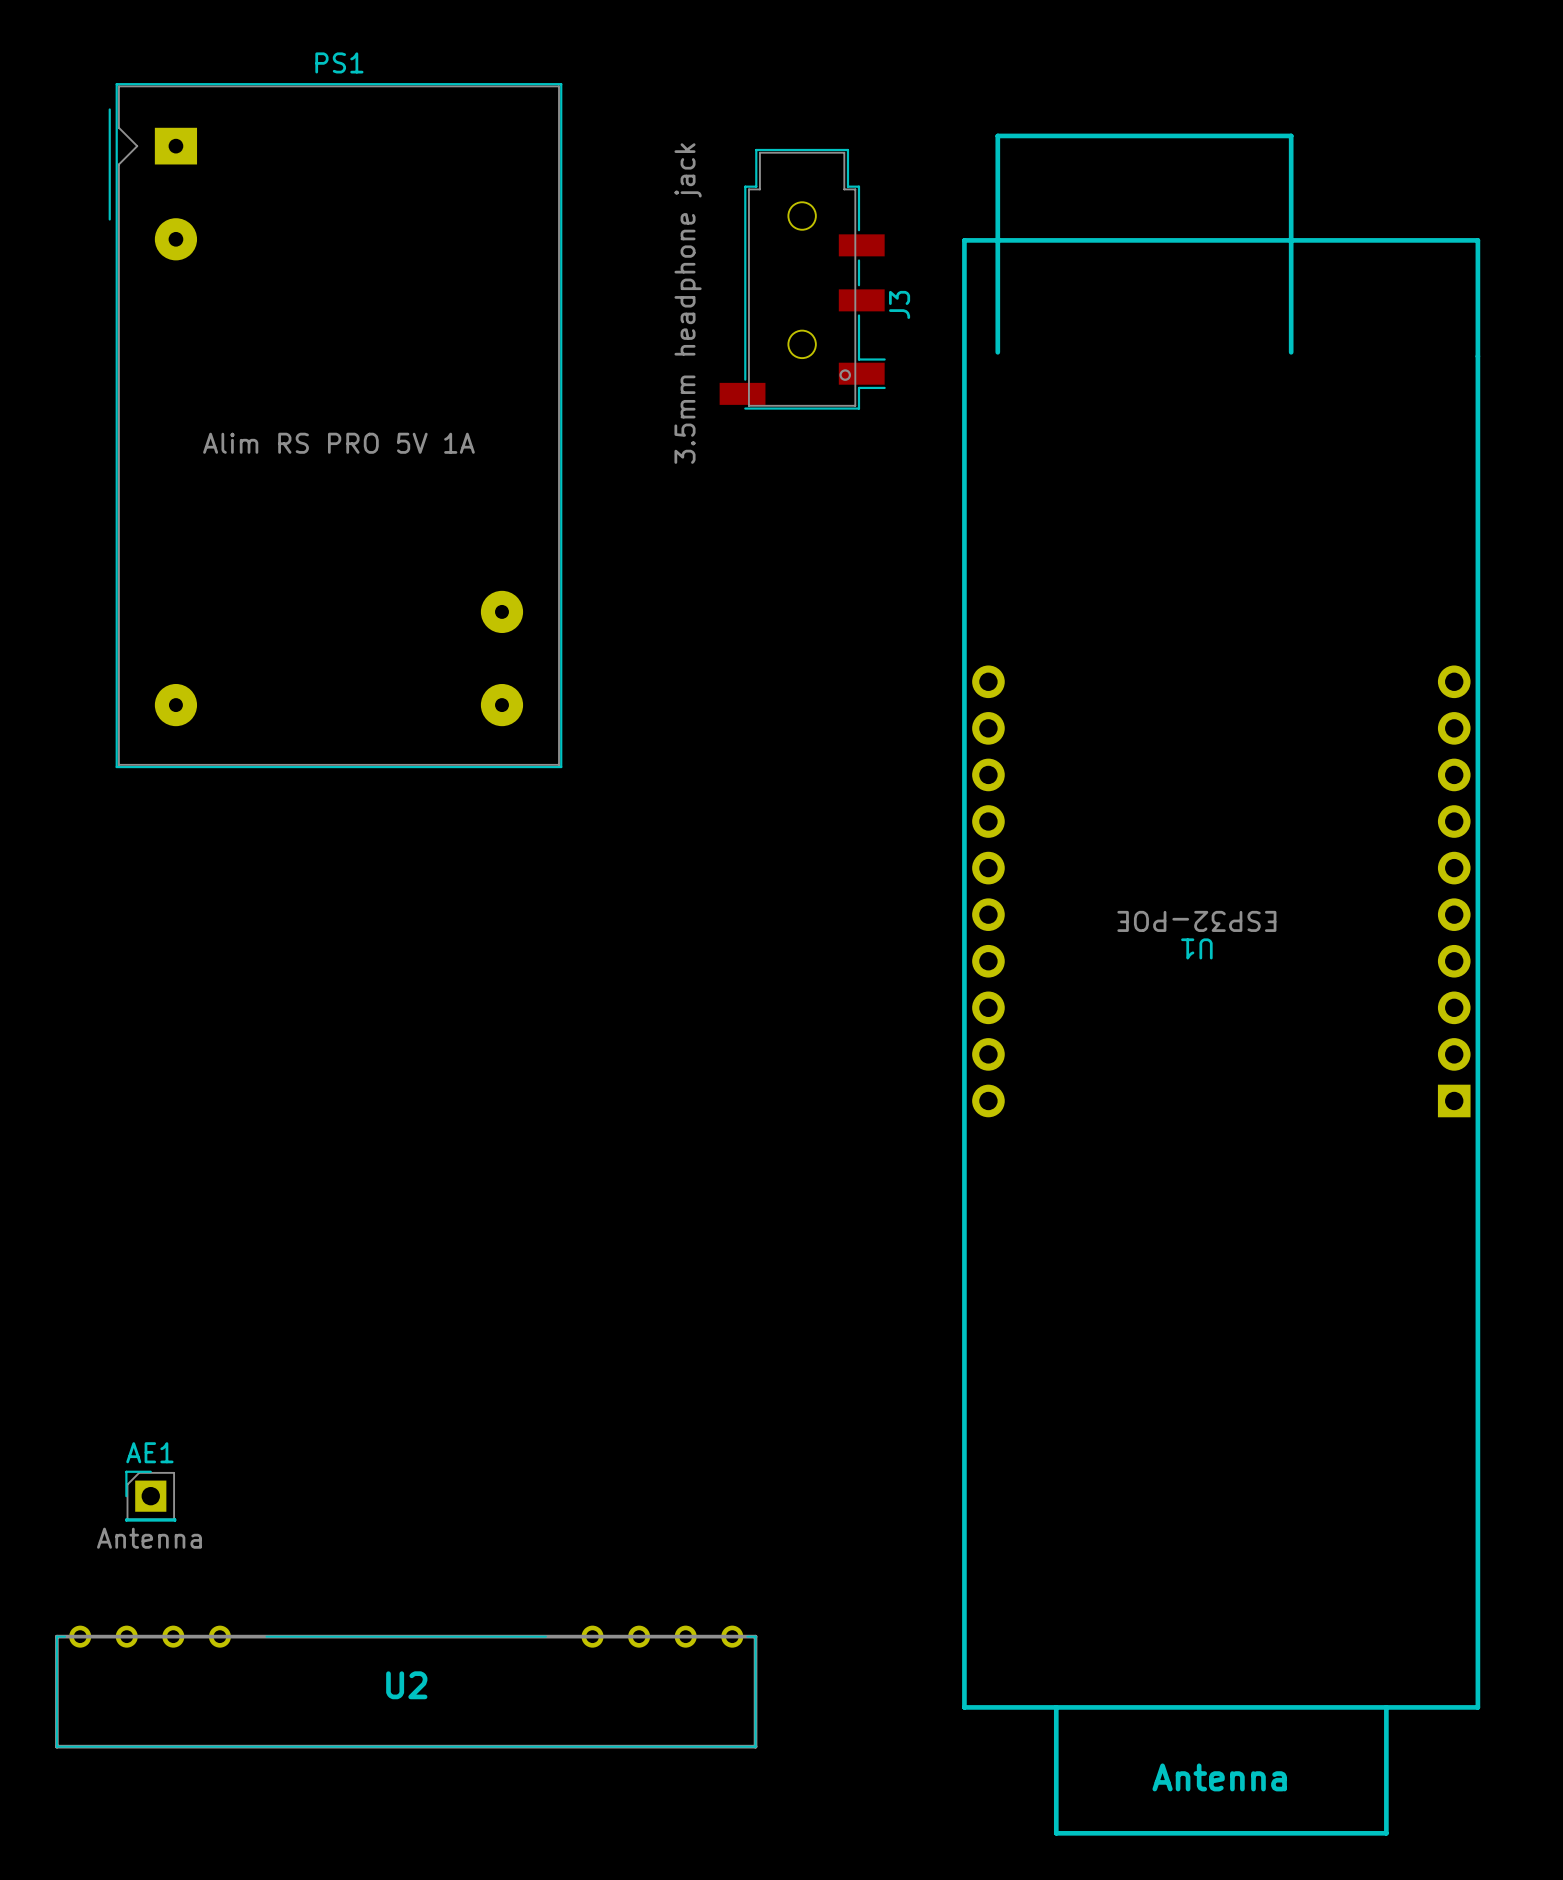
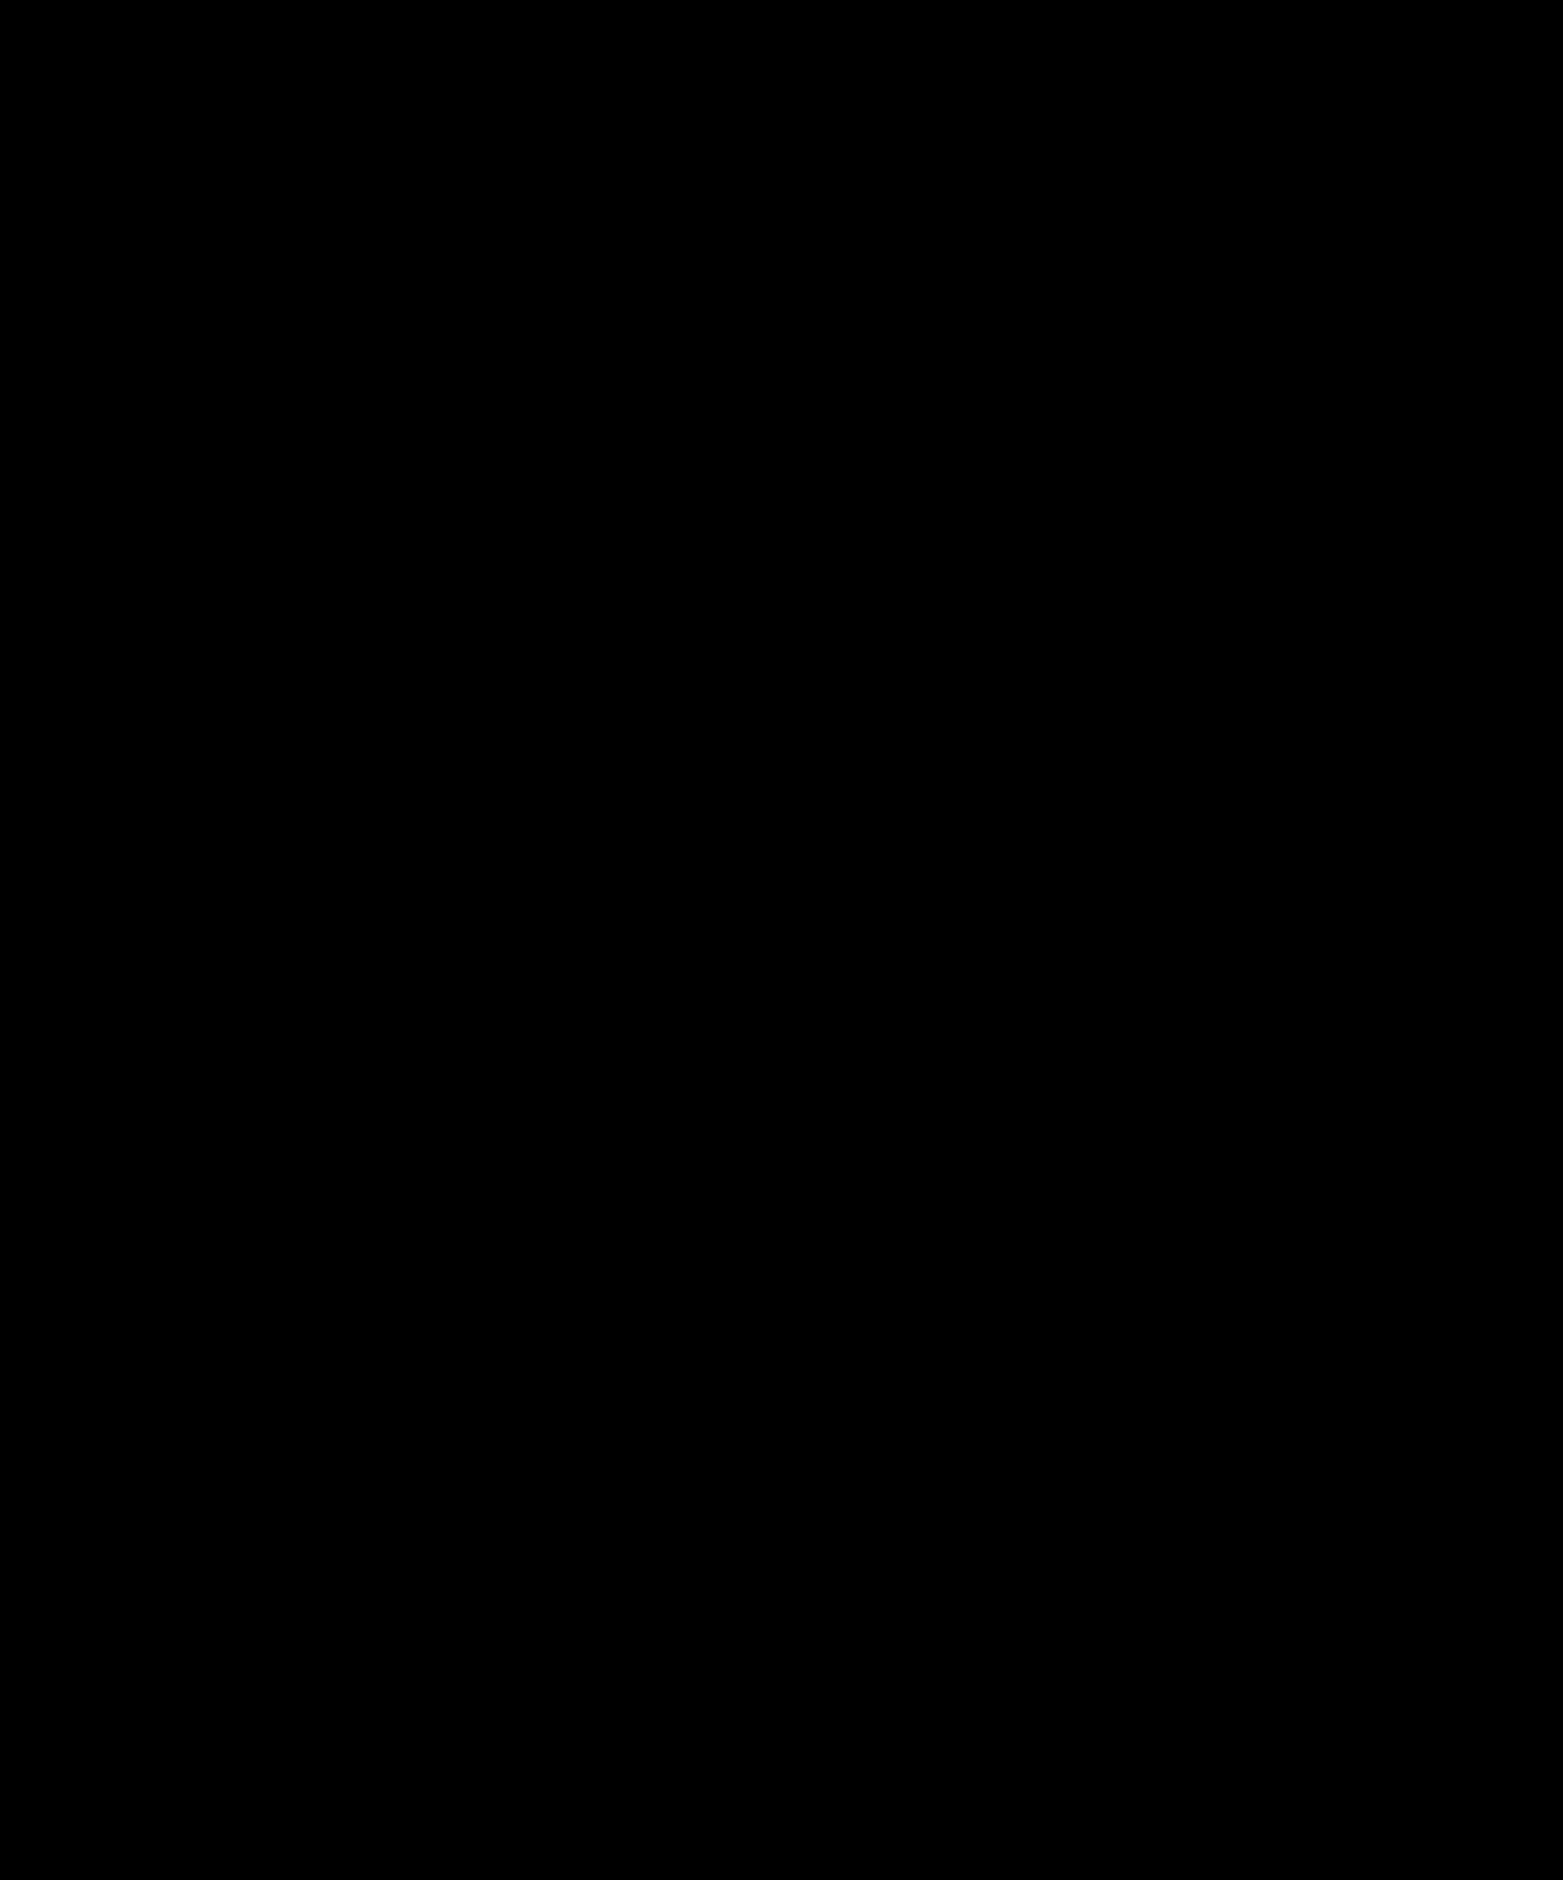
J3: 3.5mm headphone jack (802, 279) -> none
PS1: Alim RS PRO 5V 1A (335, 425) -> none
U1: ESP32-POE (1221, 984) -> none
AE1: Antenna (150, 1496) -> none
U2: (406, 1687) -> none

